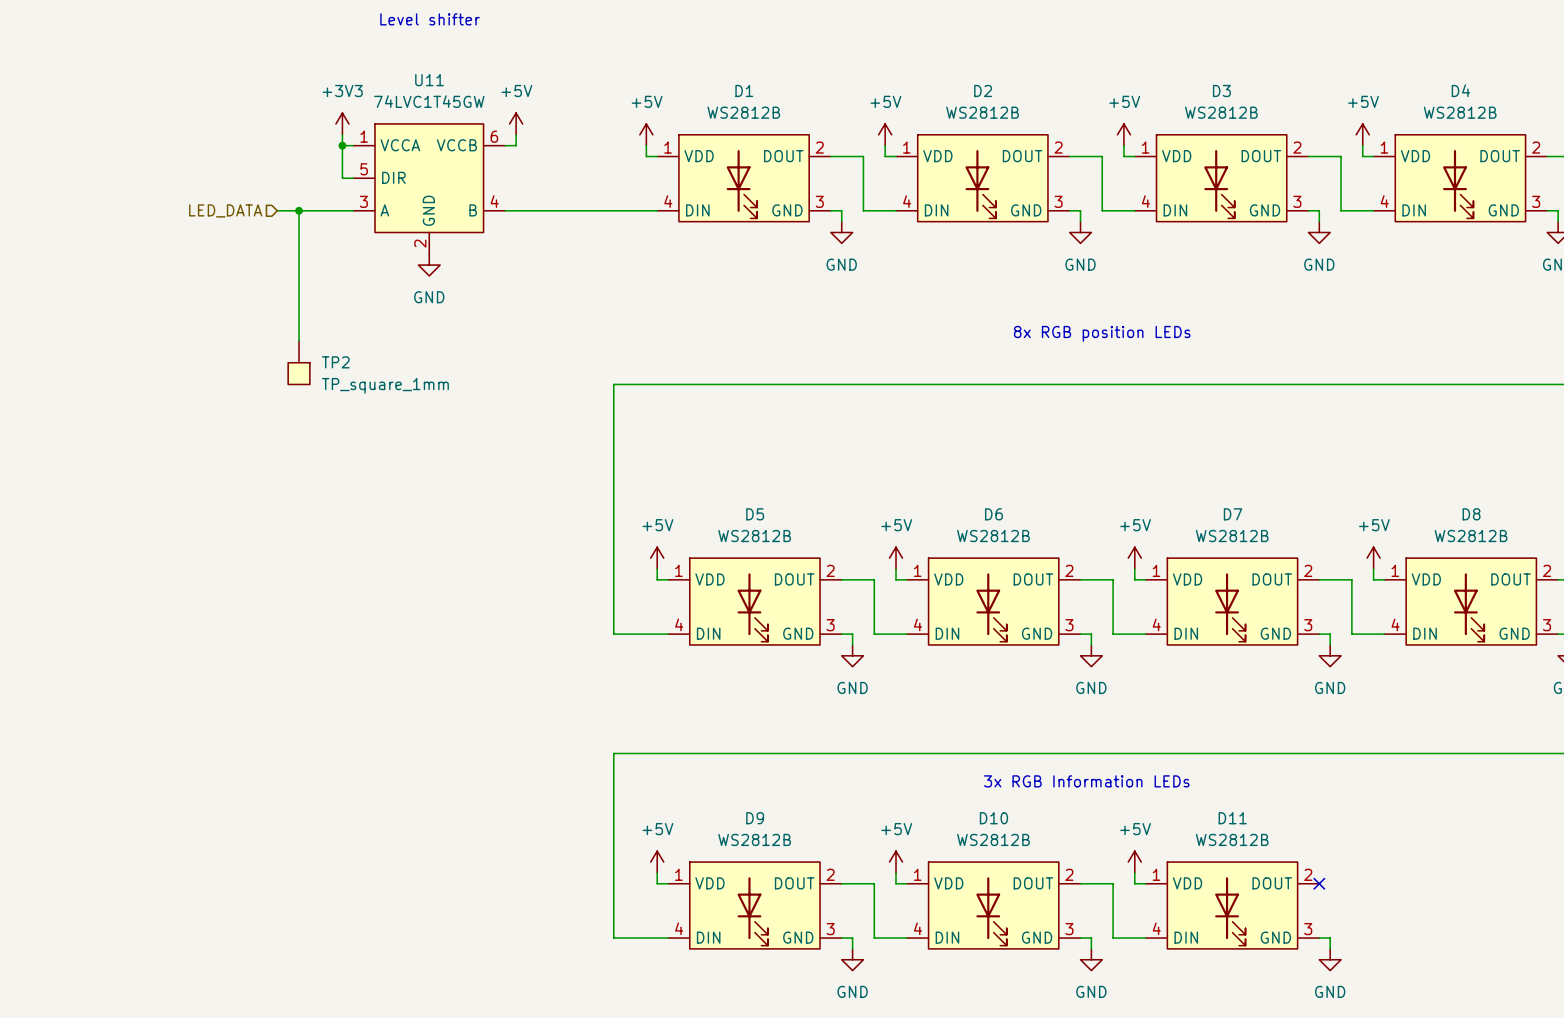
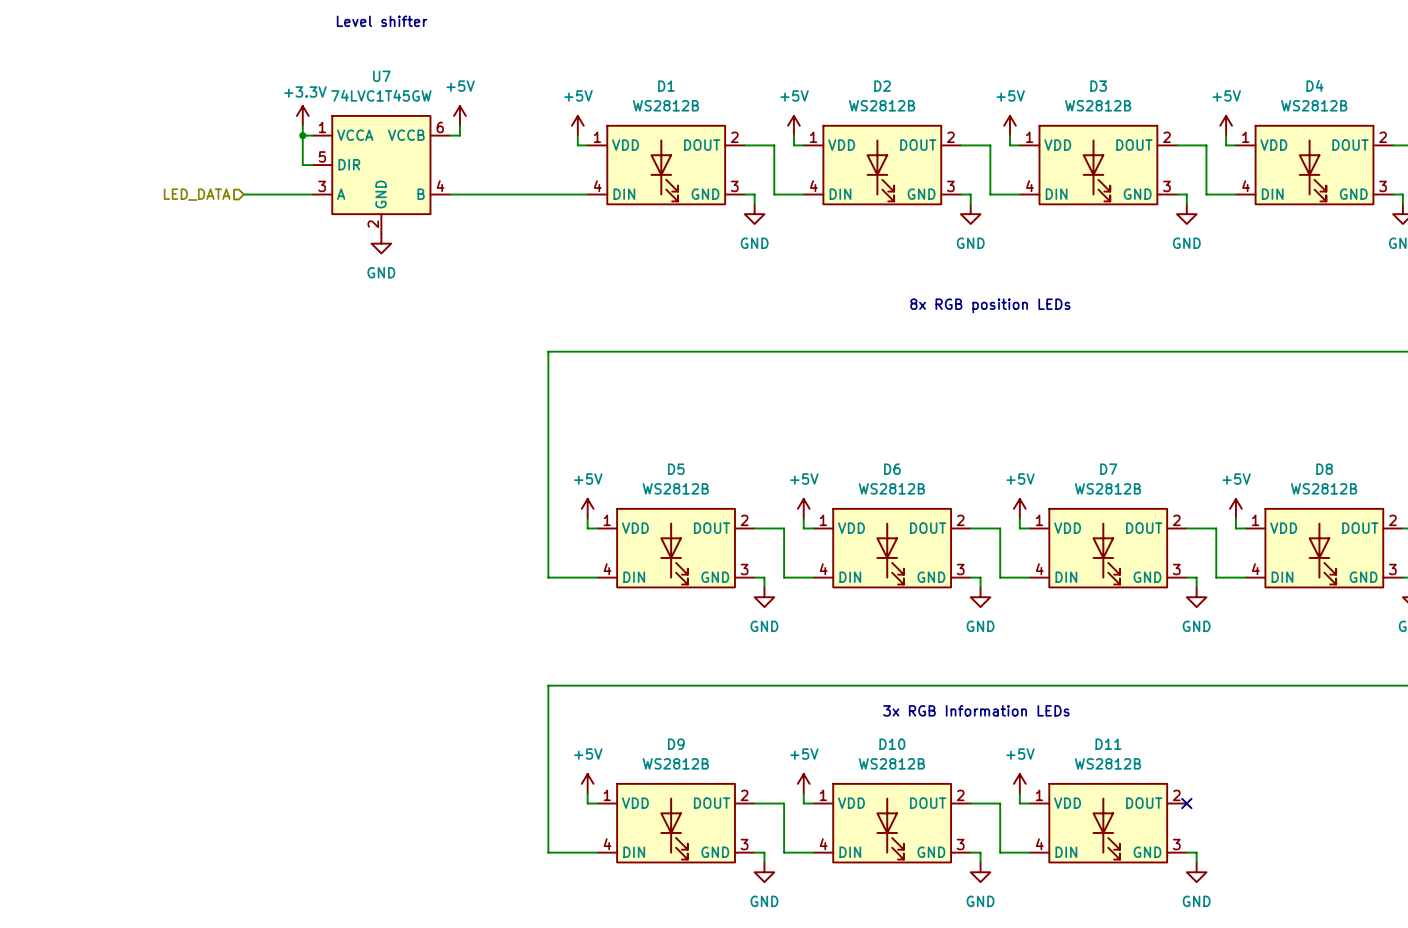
U11 name: U11 (429, 80) -> U7 (381, 76)
power symbol: +3V3 (342, 123) -> +3.3V (302, 115)
wire: (299, 210) (299, 341) -> none
junction: (299, 210) -> none
TP2: TP_square_1mm (299, 362) -> none

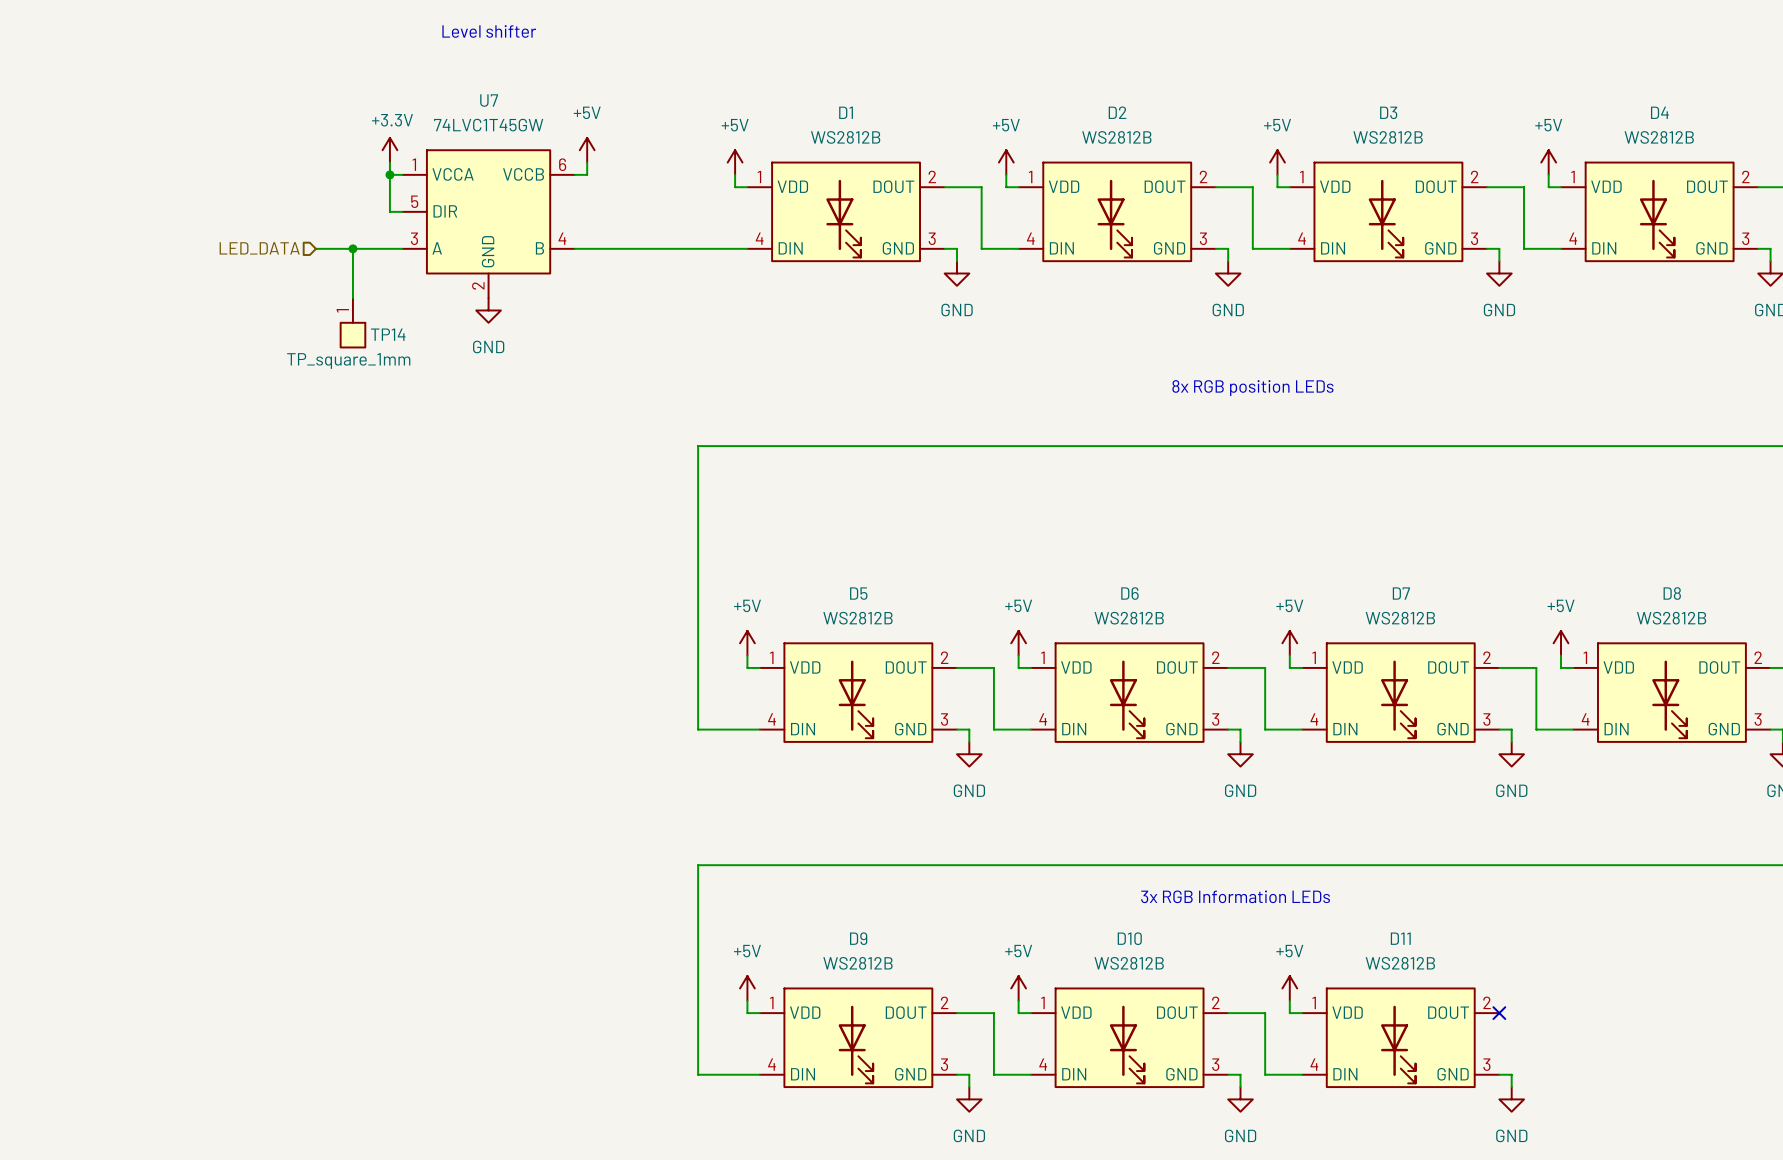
wire: none -> (352, 248) (352, 298)
junction: none -> (352, 248)
TP14: none -> TP_square_1mm (352, 322)

